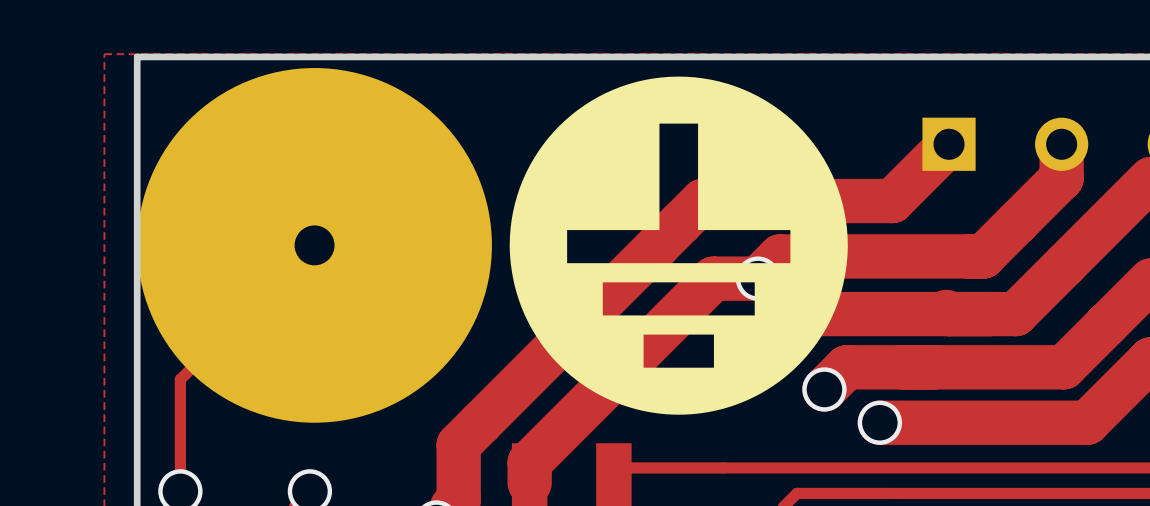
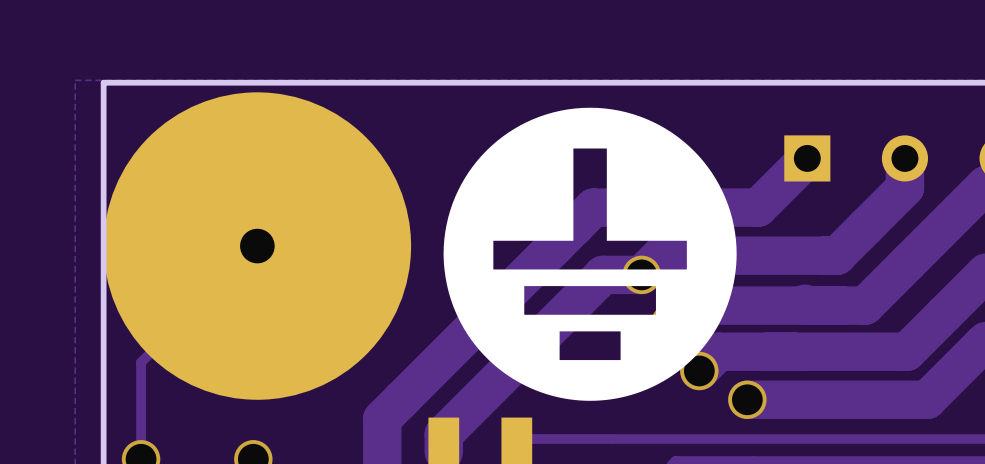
drawing position: (678, 245) -> (590, 254)

